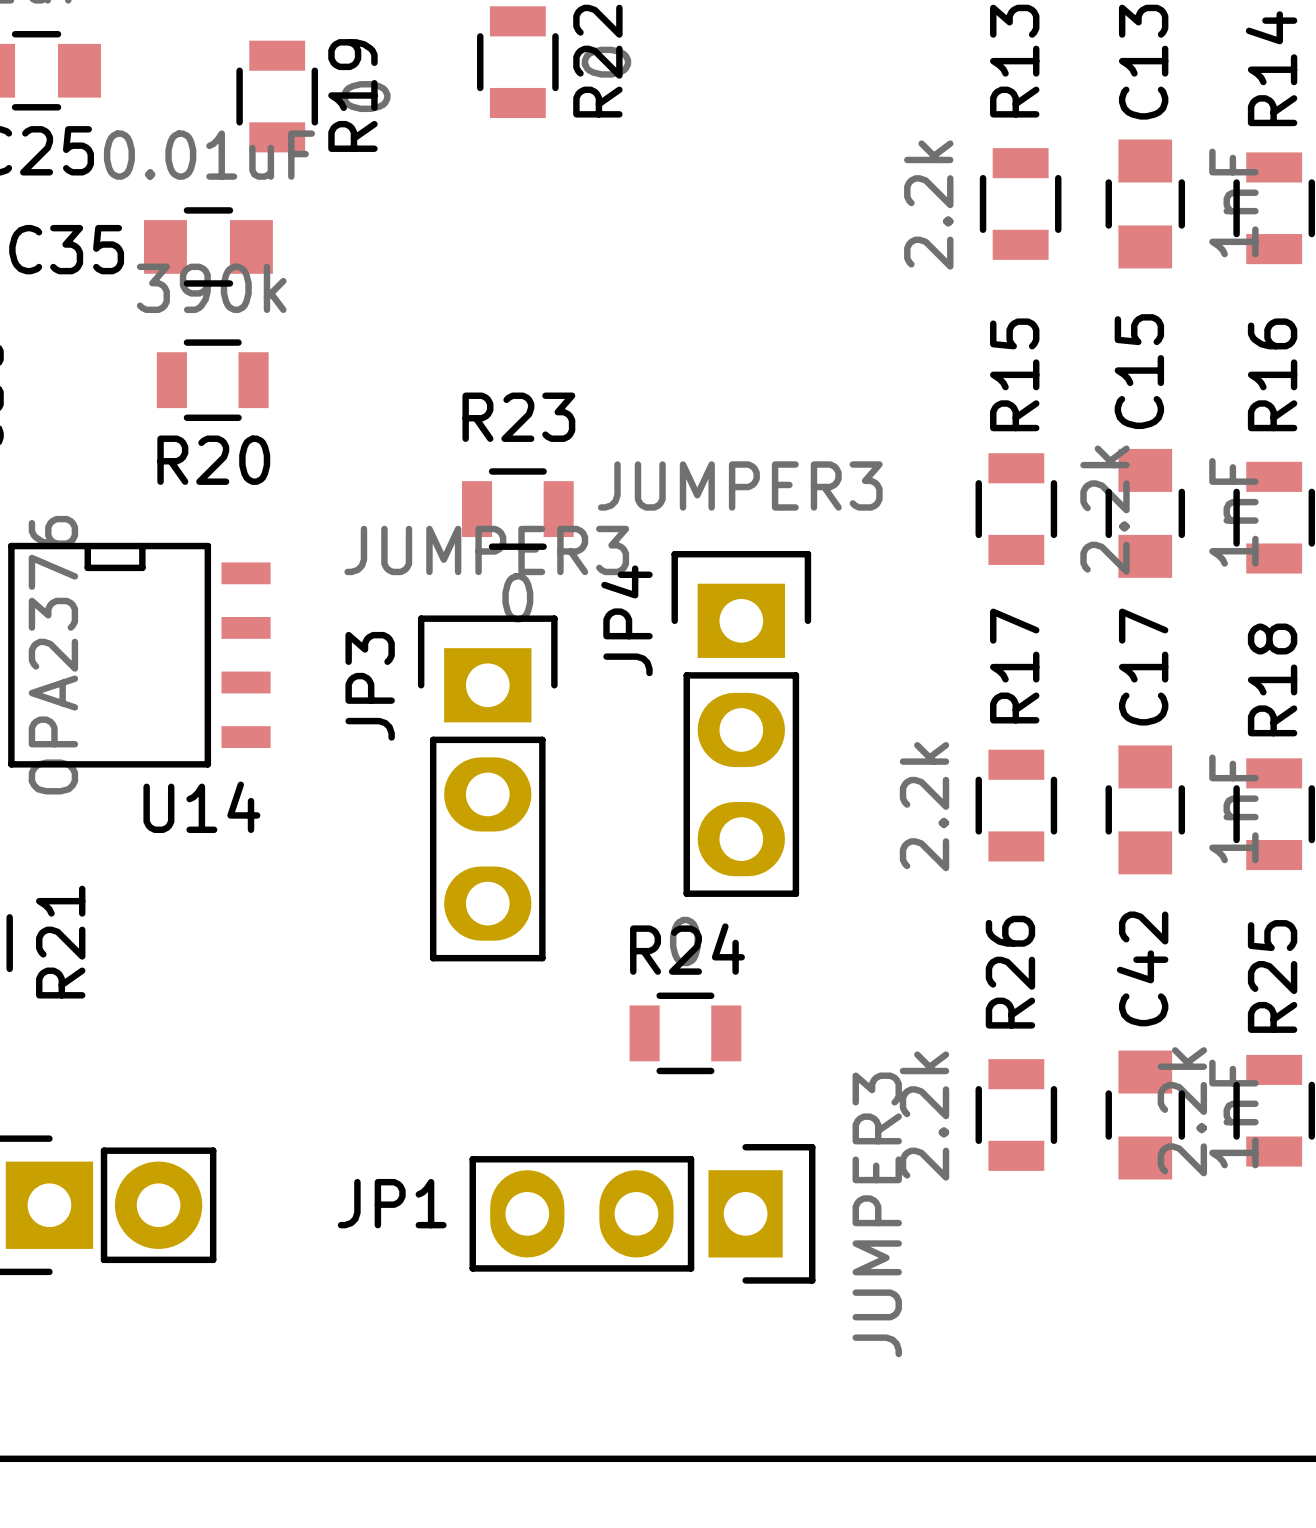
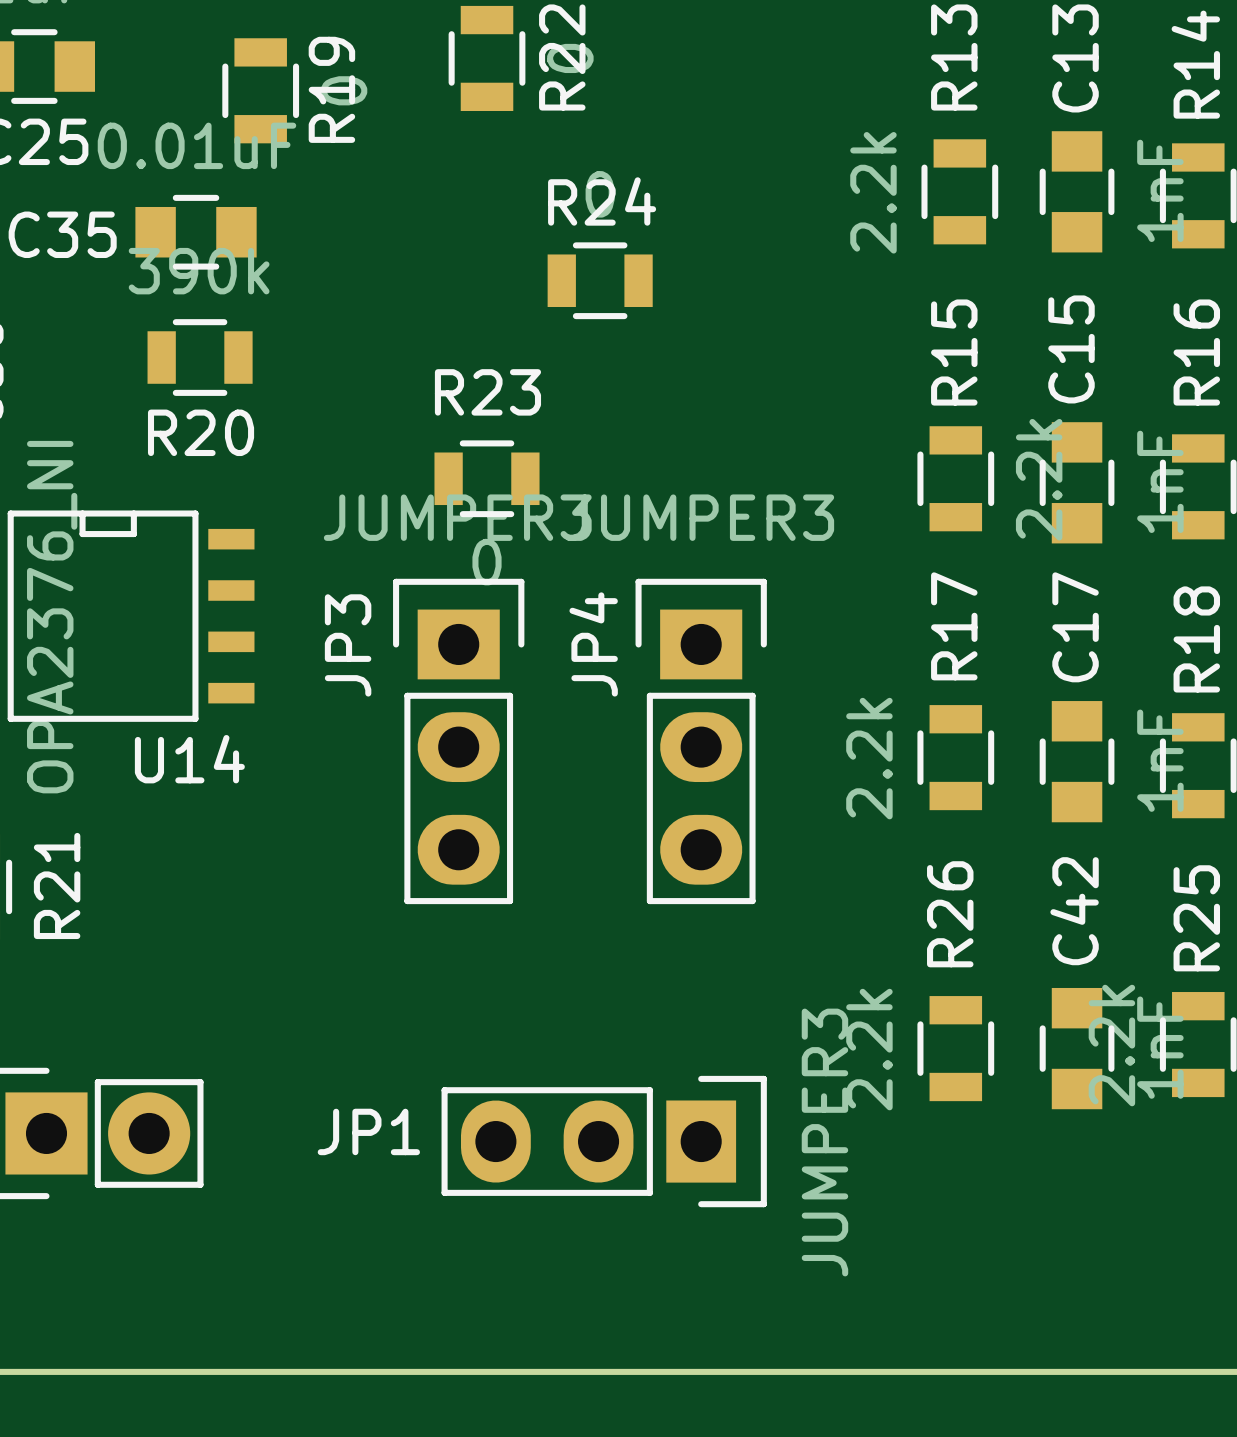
U14 value: OPA2376 (53, 655) -> OPA2376_NI (52, 617)
JP4 position: (741, 723) -> (701, 741)
R24 position: (685, 1033) -> (600, 280)

